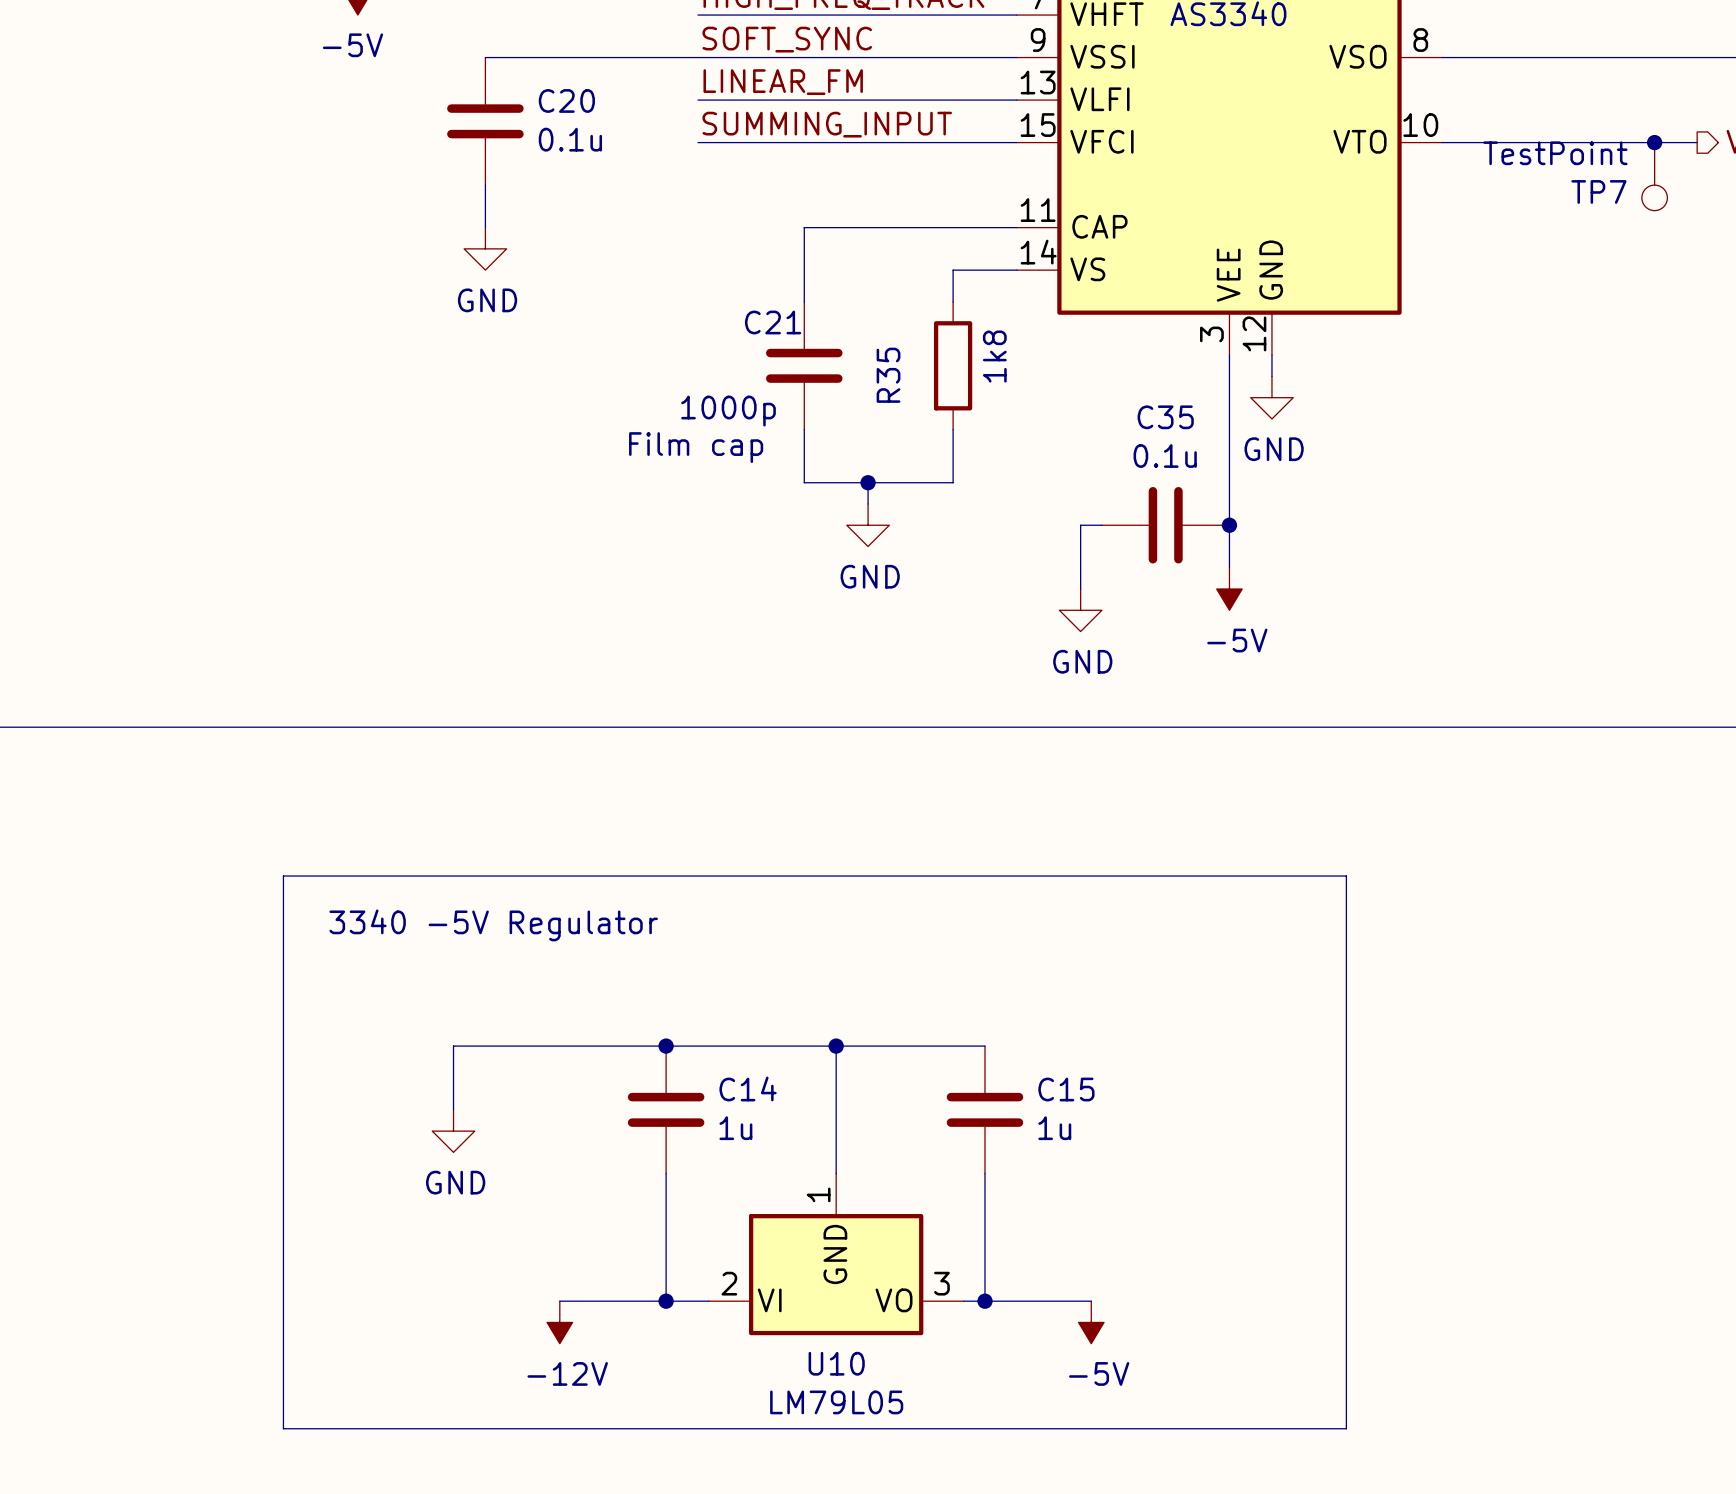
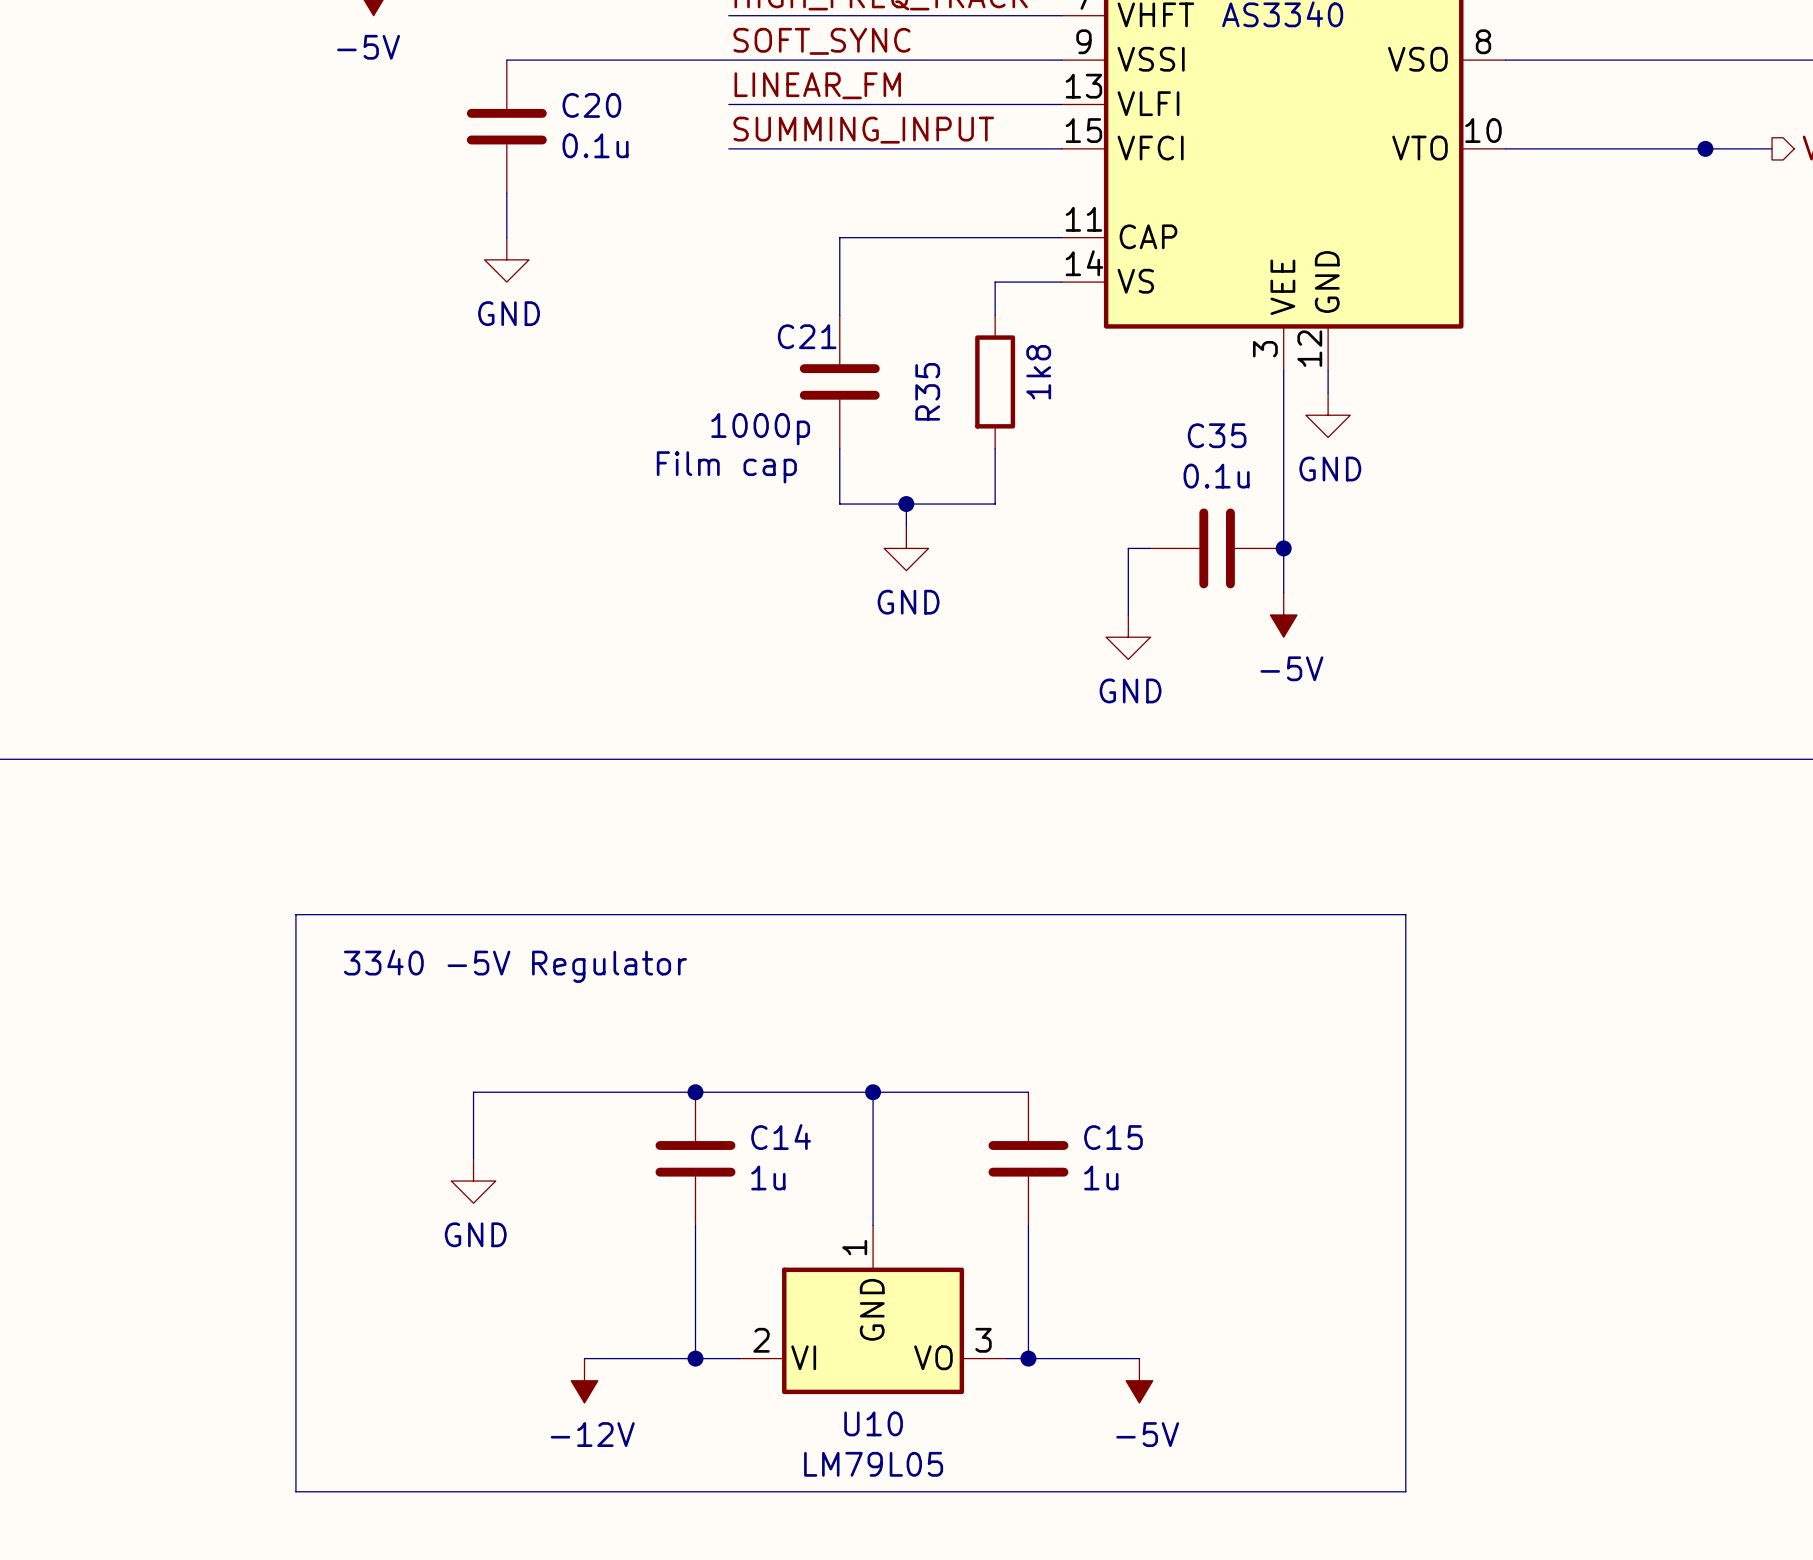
junction position: (1654, 142) -> (1705, 148)
TP7: TestPoint (1654, 176) -> none

